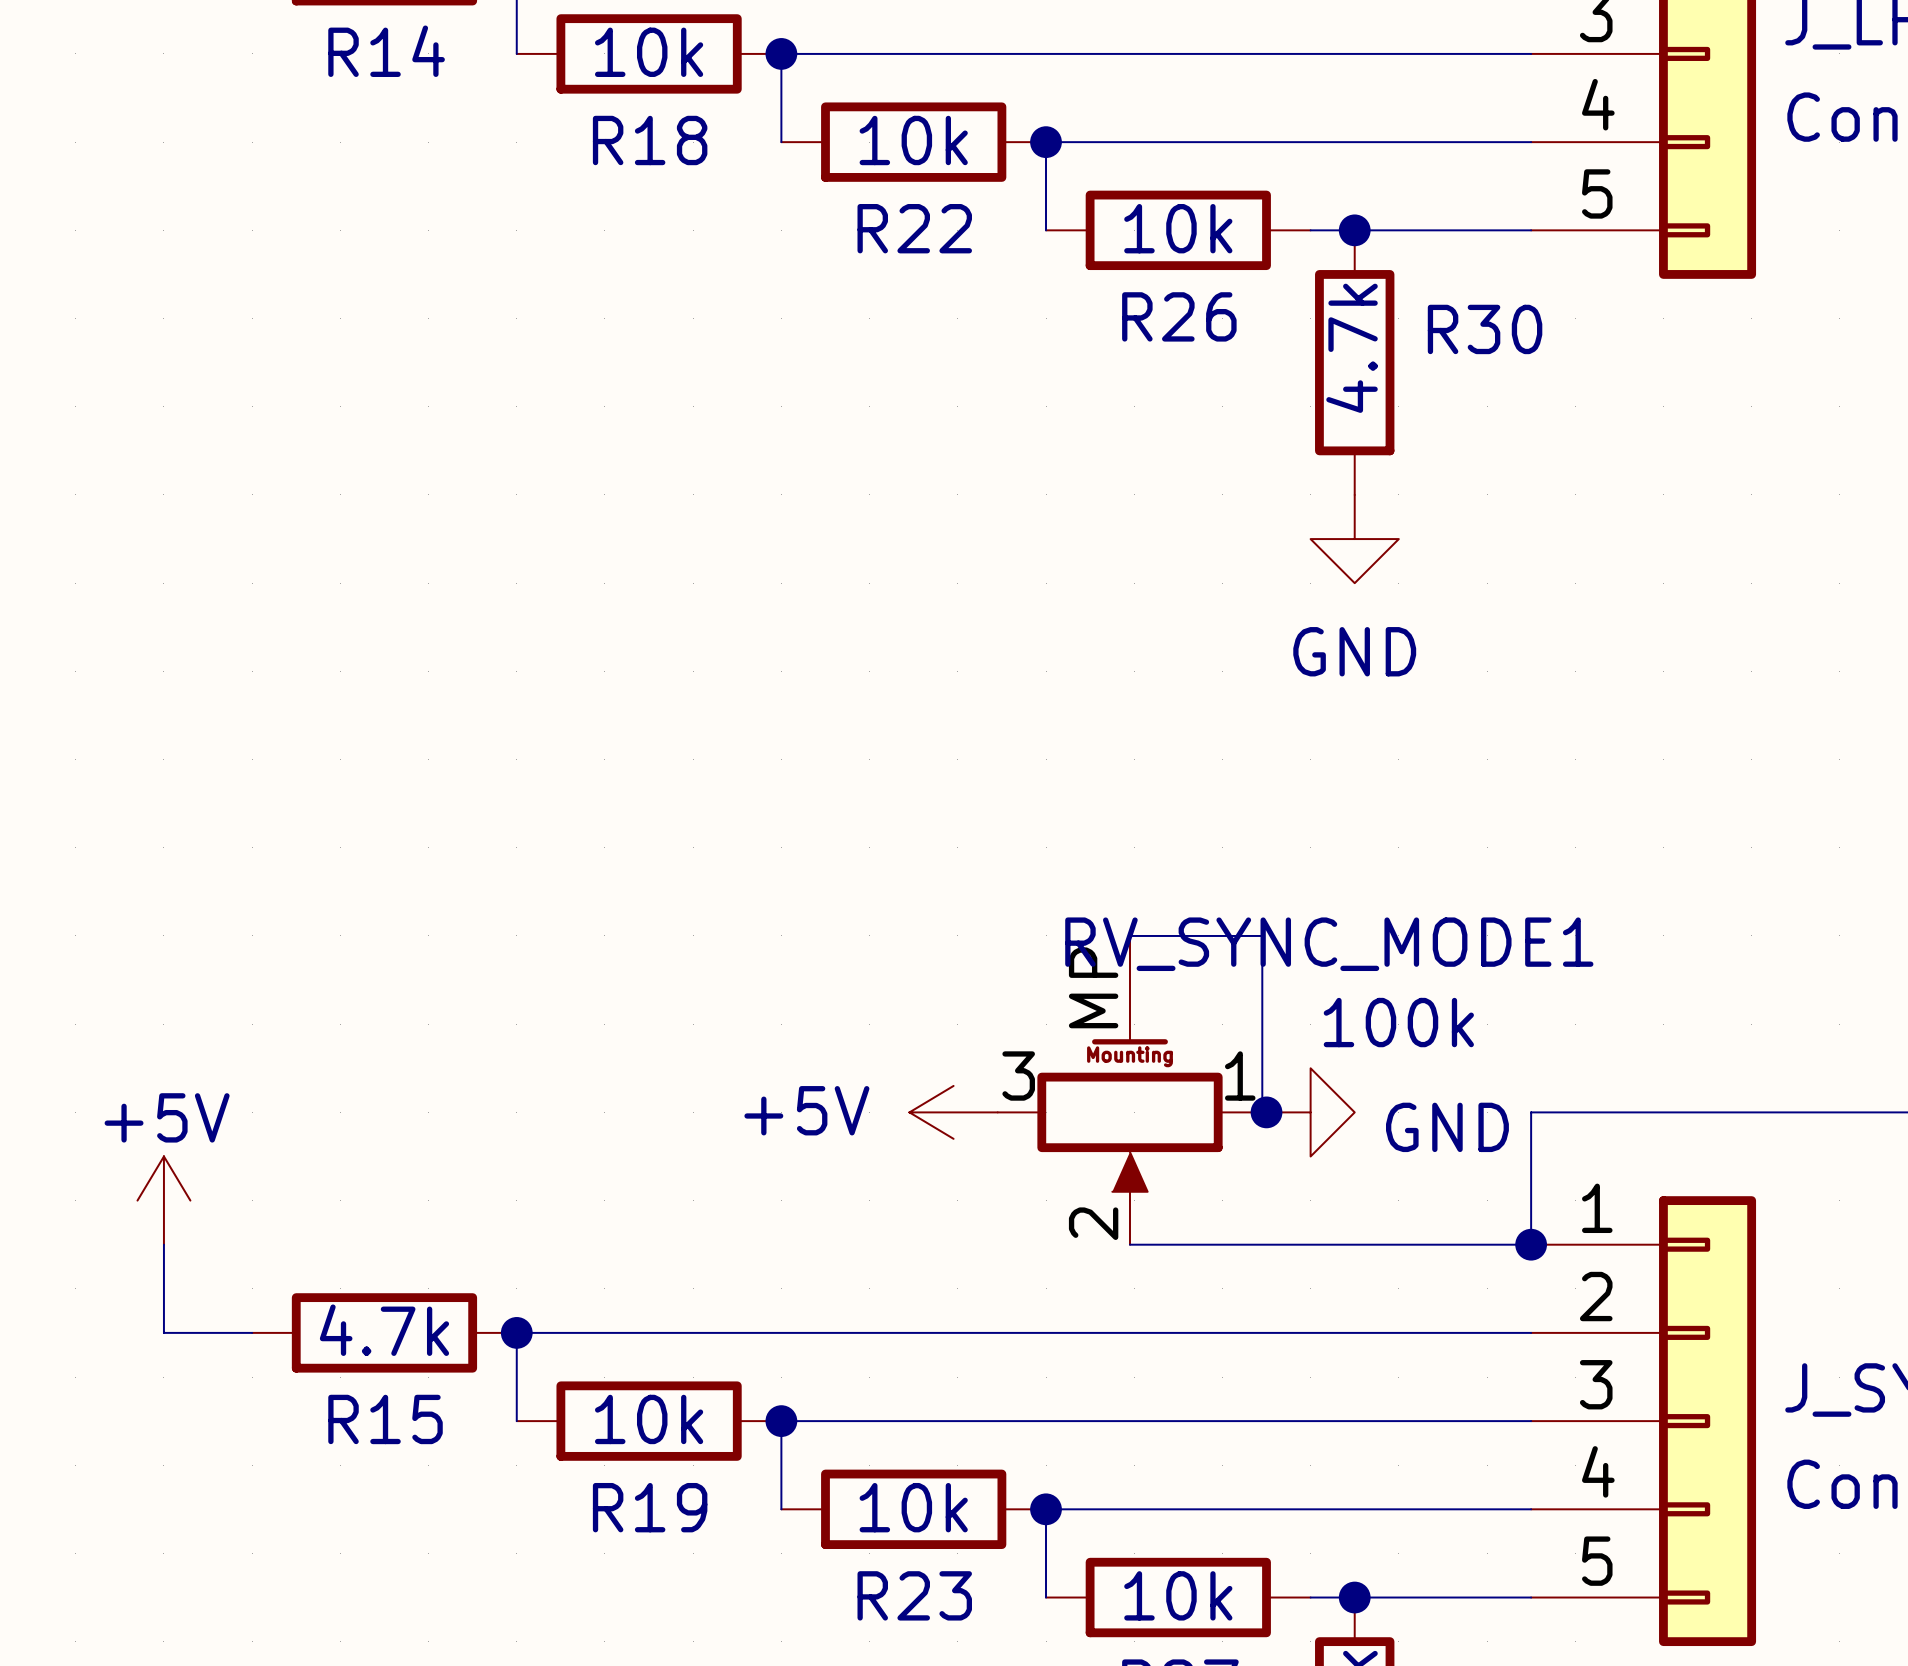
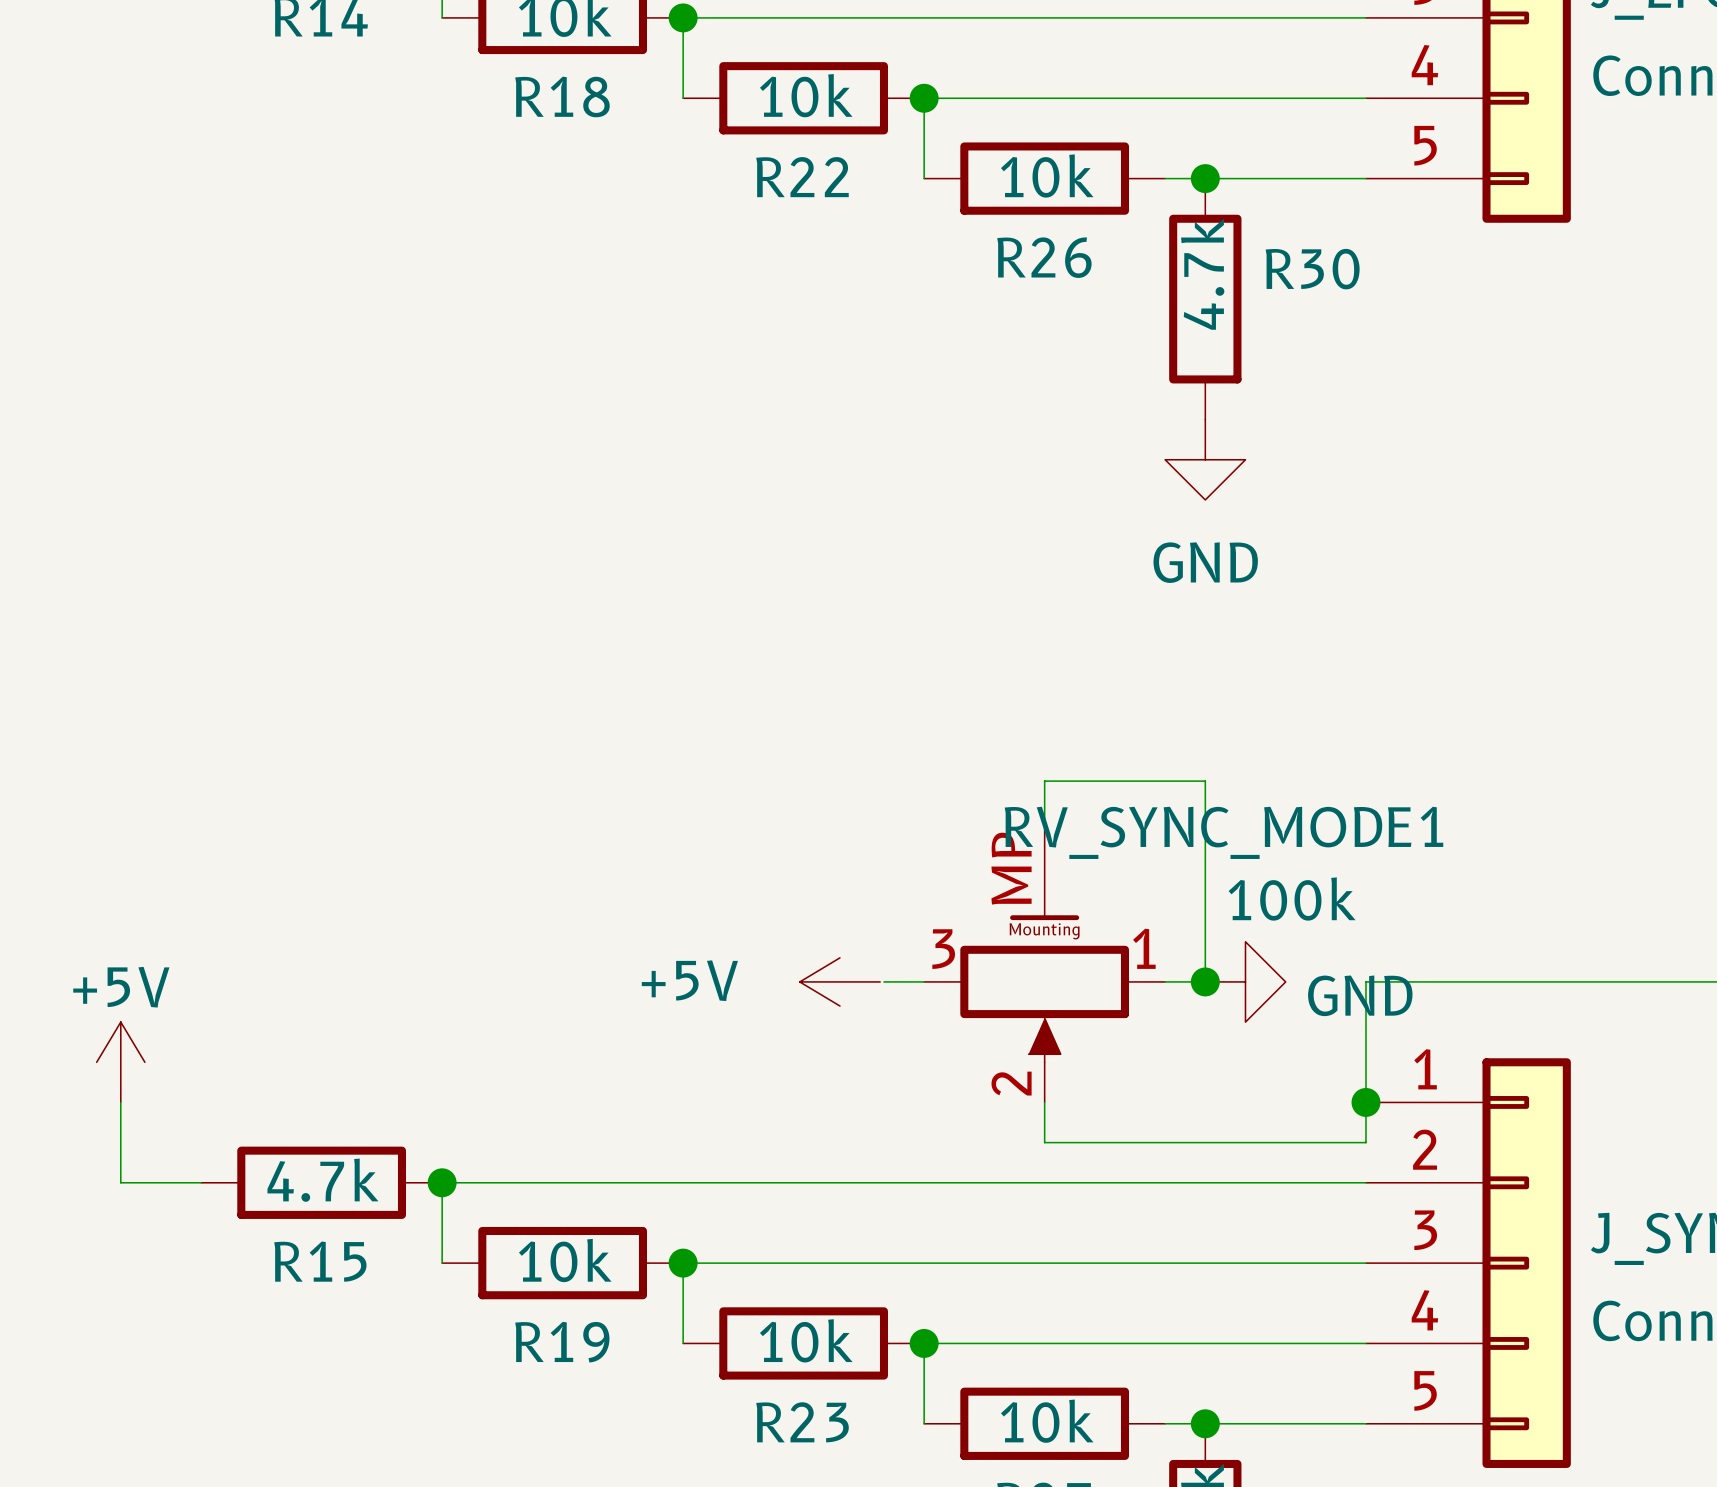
wire: (1129, 935) (1262, 935) (1262, 1112) -> none
wire: none -> (1044, 821) (1044, 781) (1205, 781) (1205, 981) (1165, 981)
RV_SYNC_MODE1 position: (1129, 1090) -> (1044, 961)
junction position: (1266, 1112) -> (1205, 981)
power symbol position: GND (1310, 1112) -> GND (1245, 981)
wire: (1129, 1244) (1531, 1244) -> (1044, 1102) (1044, 1142) (1365, 1142) (1365, 1102)

